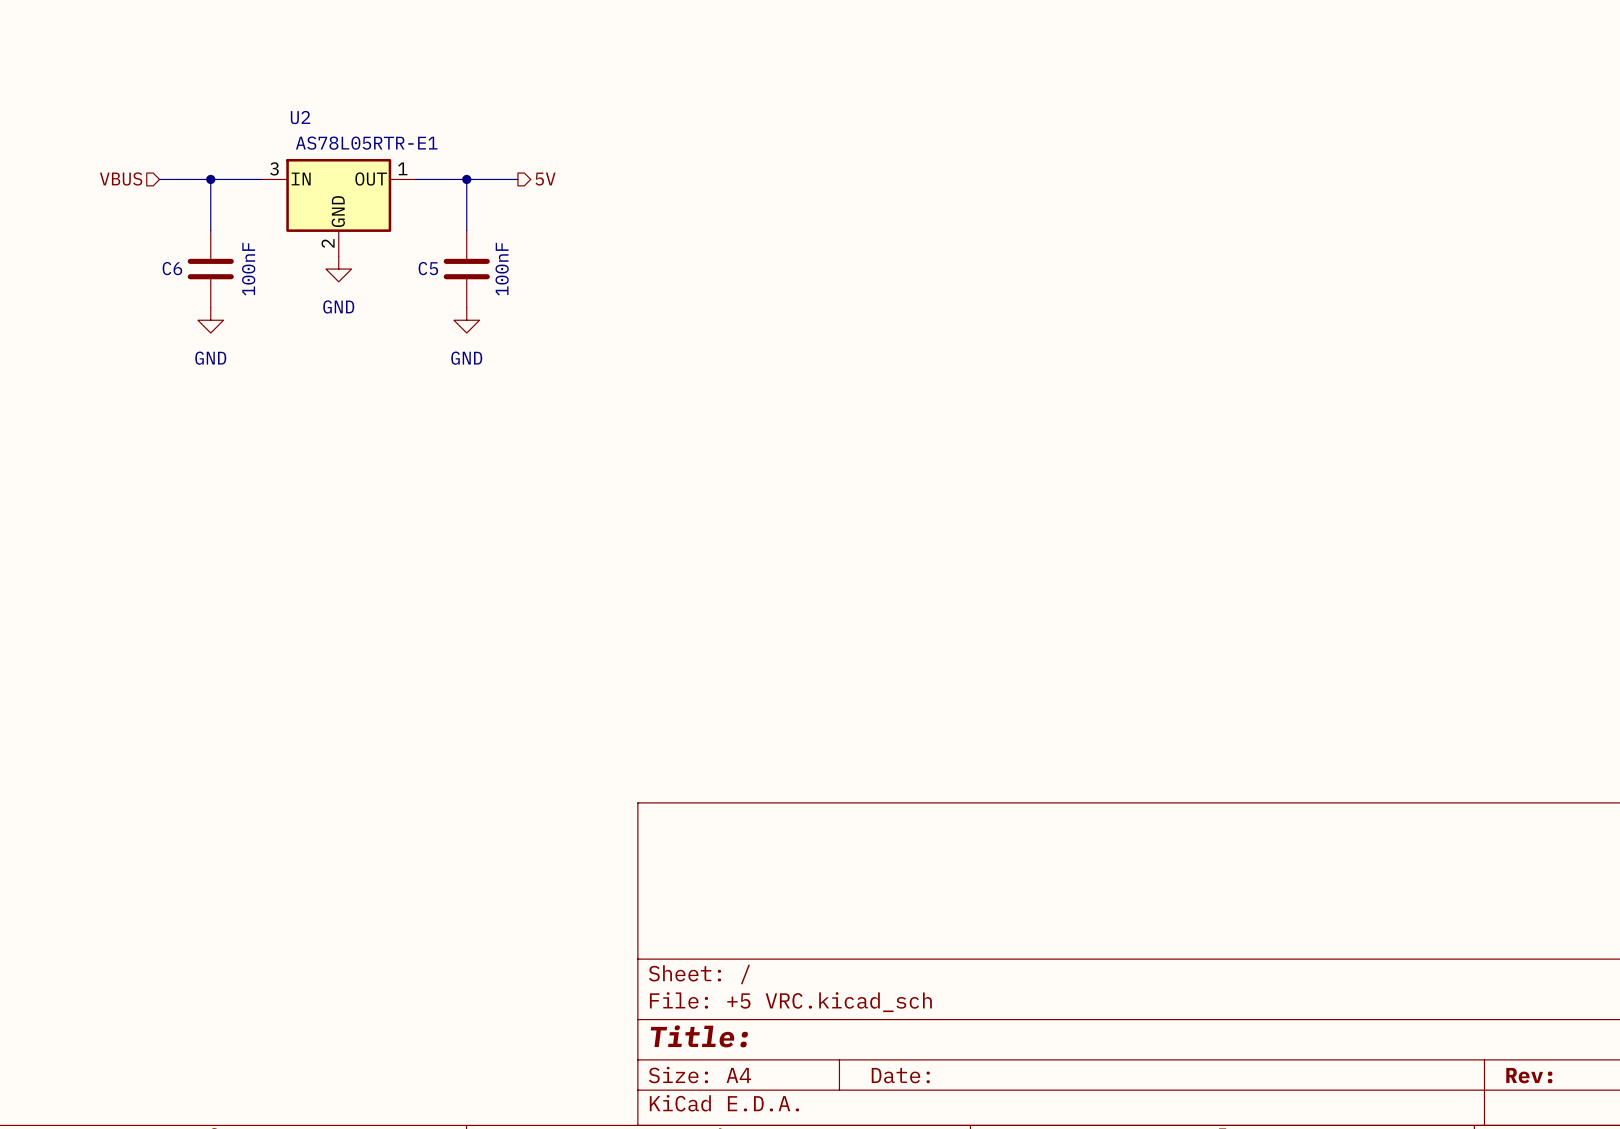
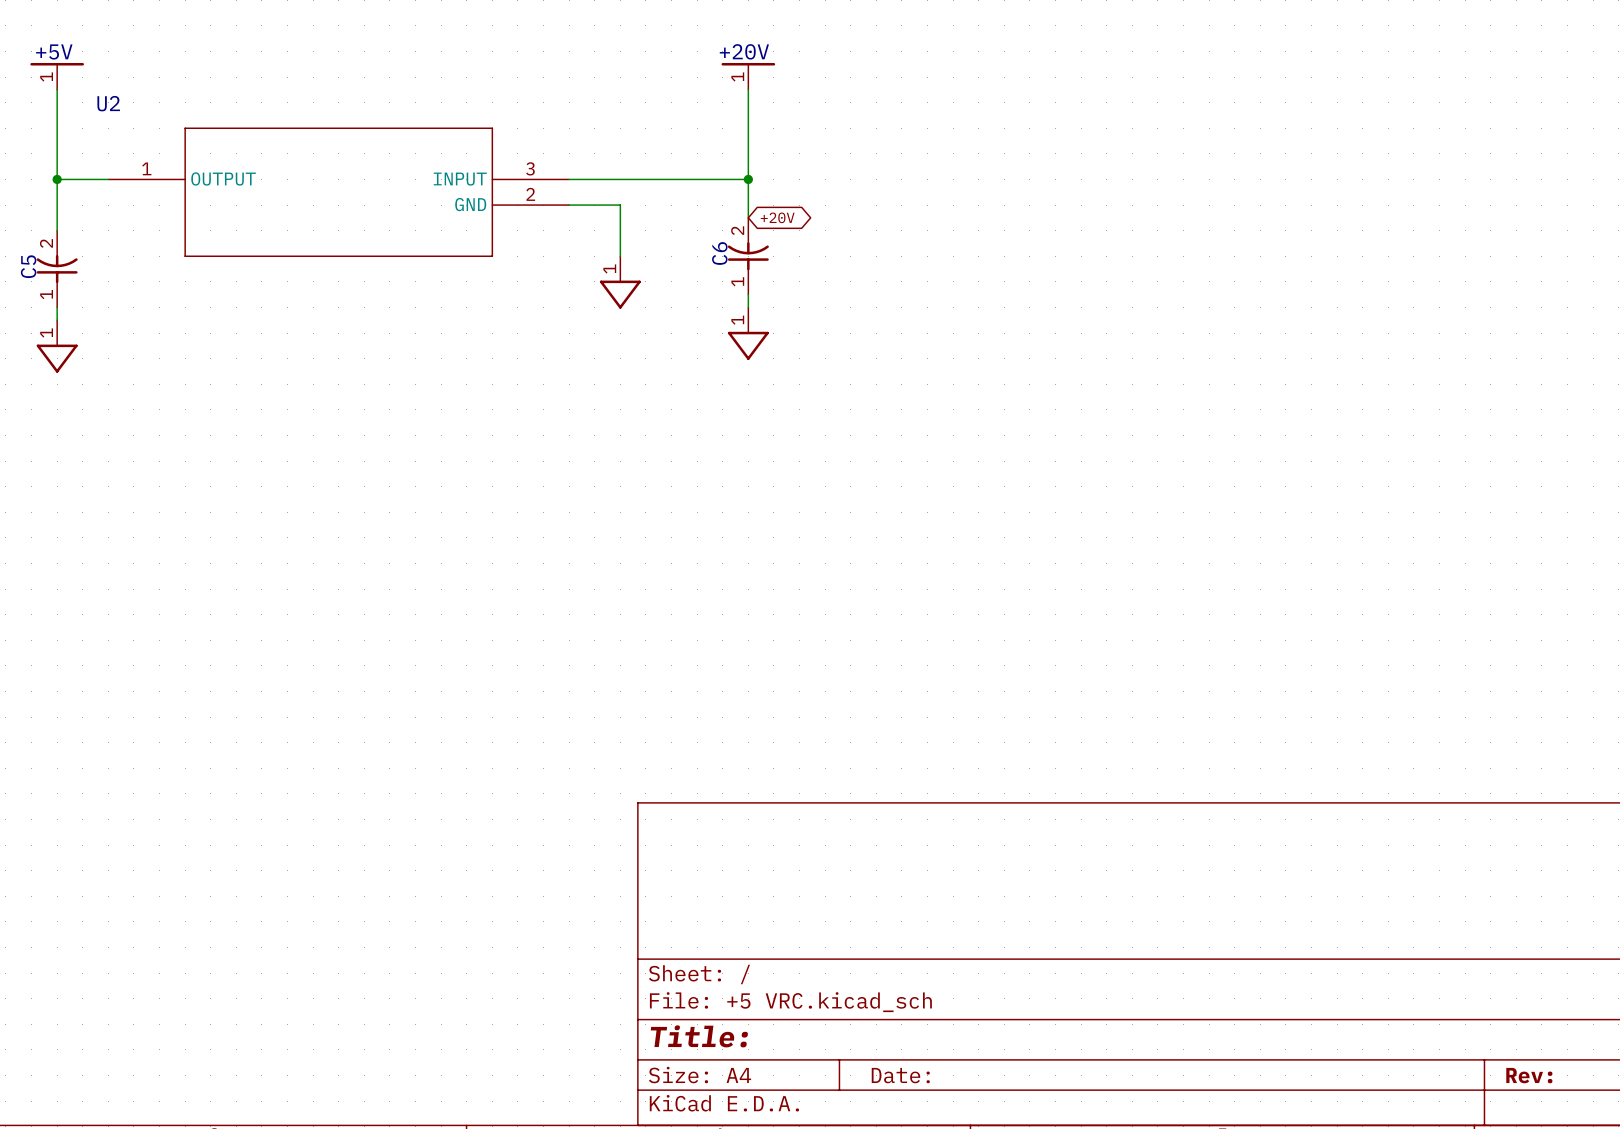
text: none -> +5V (54, 51)
text: none -> +20V (744, 51)
power symbol: none -> (57, 76)
power symbol: none -> (748, 76)
wire: none -> (57, 89) (57, 230)
wire: none -> (748, 89) (748, 217)
text: none -> U2 (108, 103)
hierarchical label: VBUS (121, 178) -> none
wire: none -> (57, 179) (108, 179)
junction: none -> (57, 179)
wire: (159, 179) (261, 179) -> none
wire: (210, 179) (210, 230) -> none
junction: (210, 179) -> none
wire: (415, 179) (517, 179) -> none
wire: (466, 179) (466, 230) -> none
junction: (466, 179) -> none
hierarchical label: 5V (545, 179) -> none
wire: none -> (569, 179) (748, 179)
junction: none -> (748, 179)
part: none -> (338, 192)
wire: none -> (569, 205) (620, 205) (620, 256)
U2: AS78L05RTR-E1 (338, 207) -> none
global label: none -> +20V (777, 217)
text: none -> C6 (719, 253)
part: none -> (748, 256)
text: none -> C5 (28, 266)
part: none -> (57, 269)
C6: 100nF (210, 269) -> none
power symbol: GND (338, 269) -> none
C5: 100nF (466, 269) -> none
power symbol: none -> (620, 282)
wire: none -> (748, 294) (748, 307)
wire: none -> (57, 307) (57, 320)
power symbol: GND (210, 320) -> none
power symbol: GND (466, 320) -> none
power symbol: none -> (748, 333)
power symbol: none -> (57, 346)

